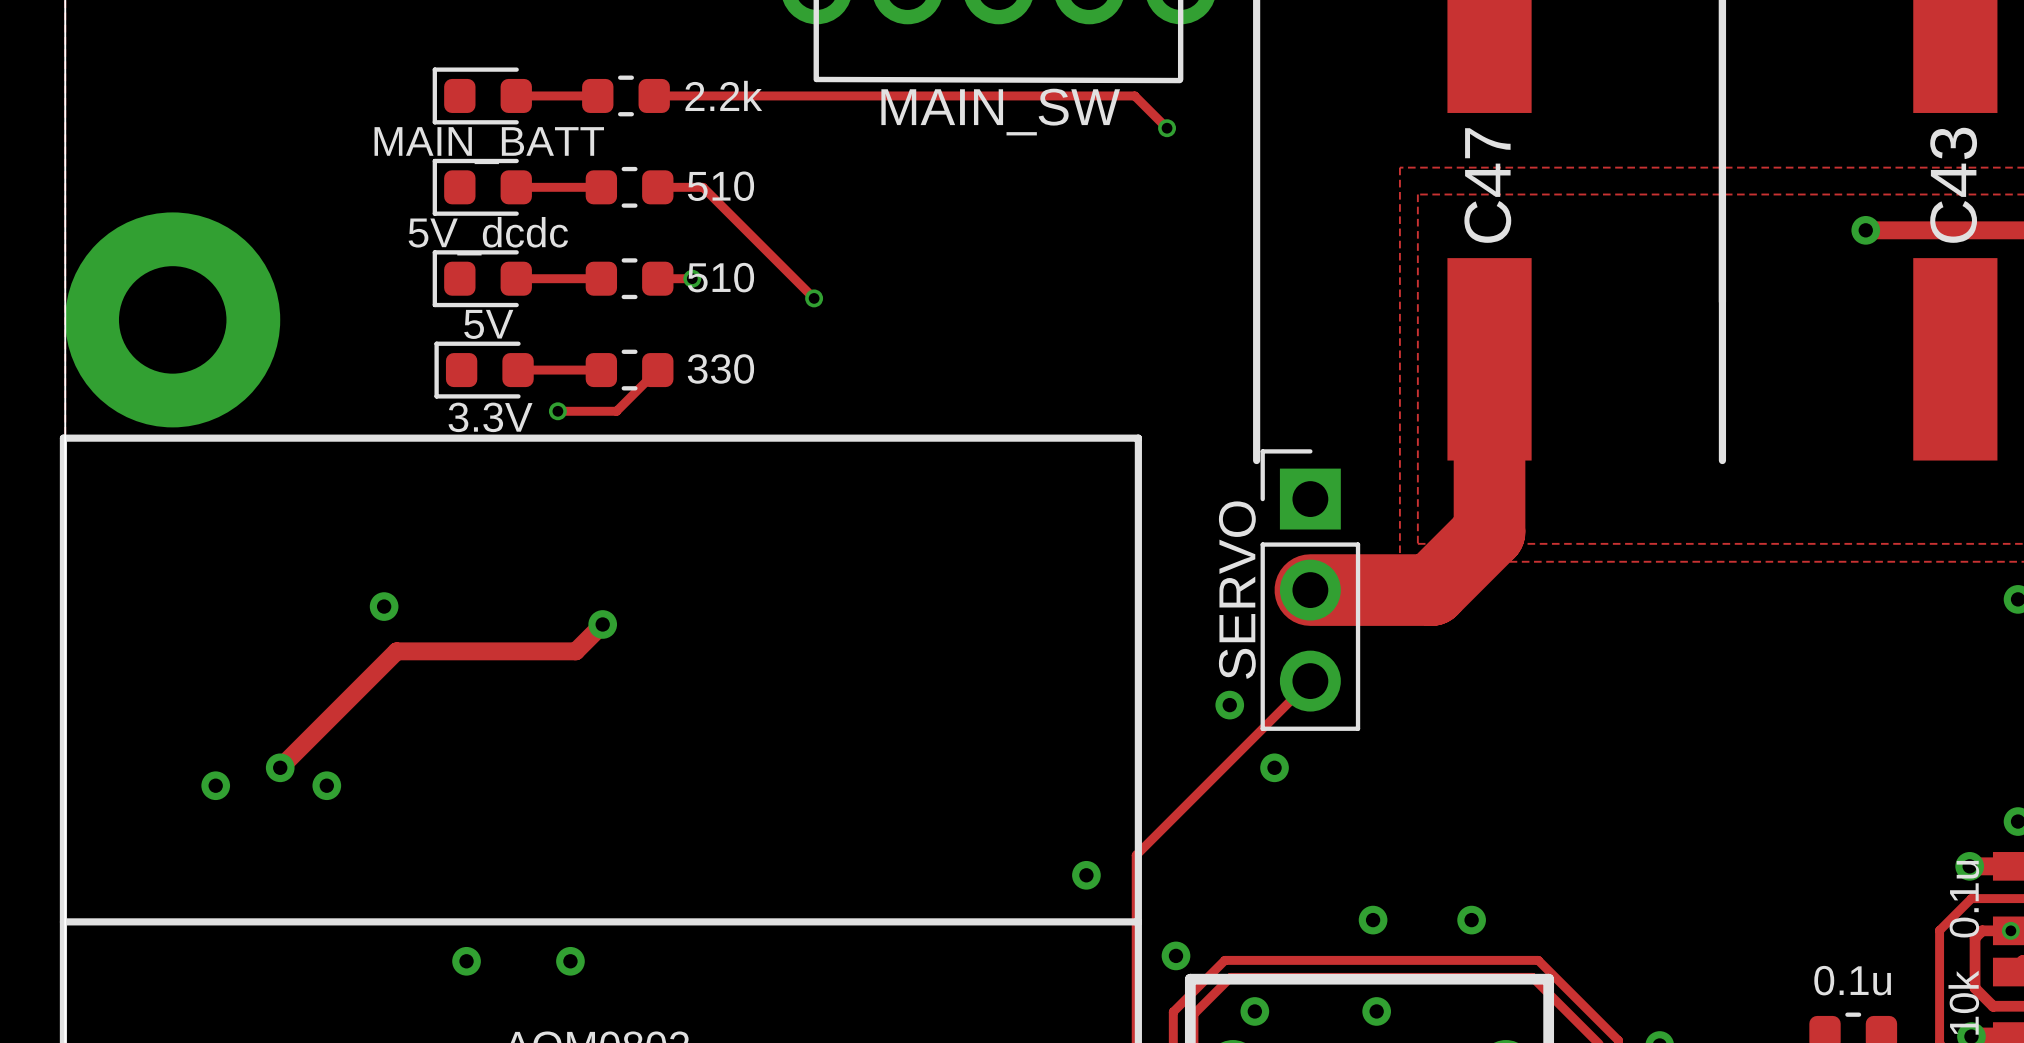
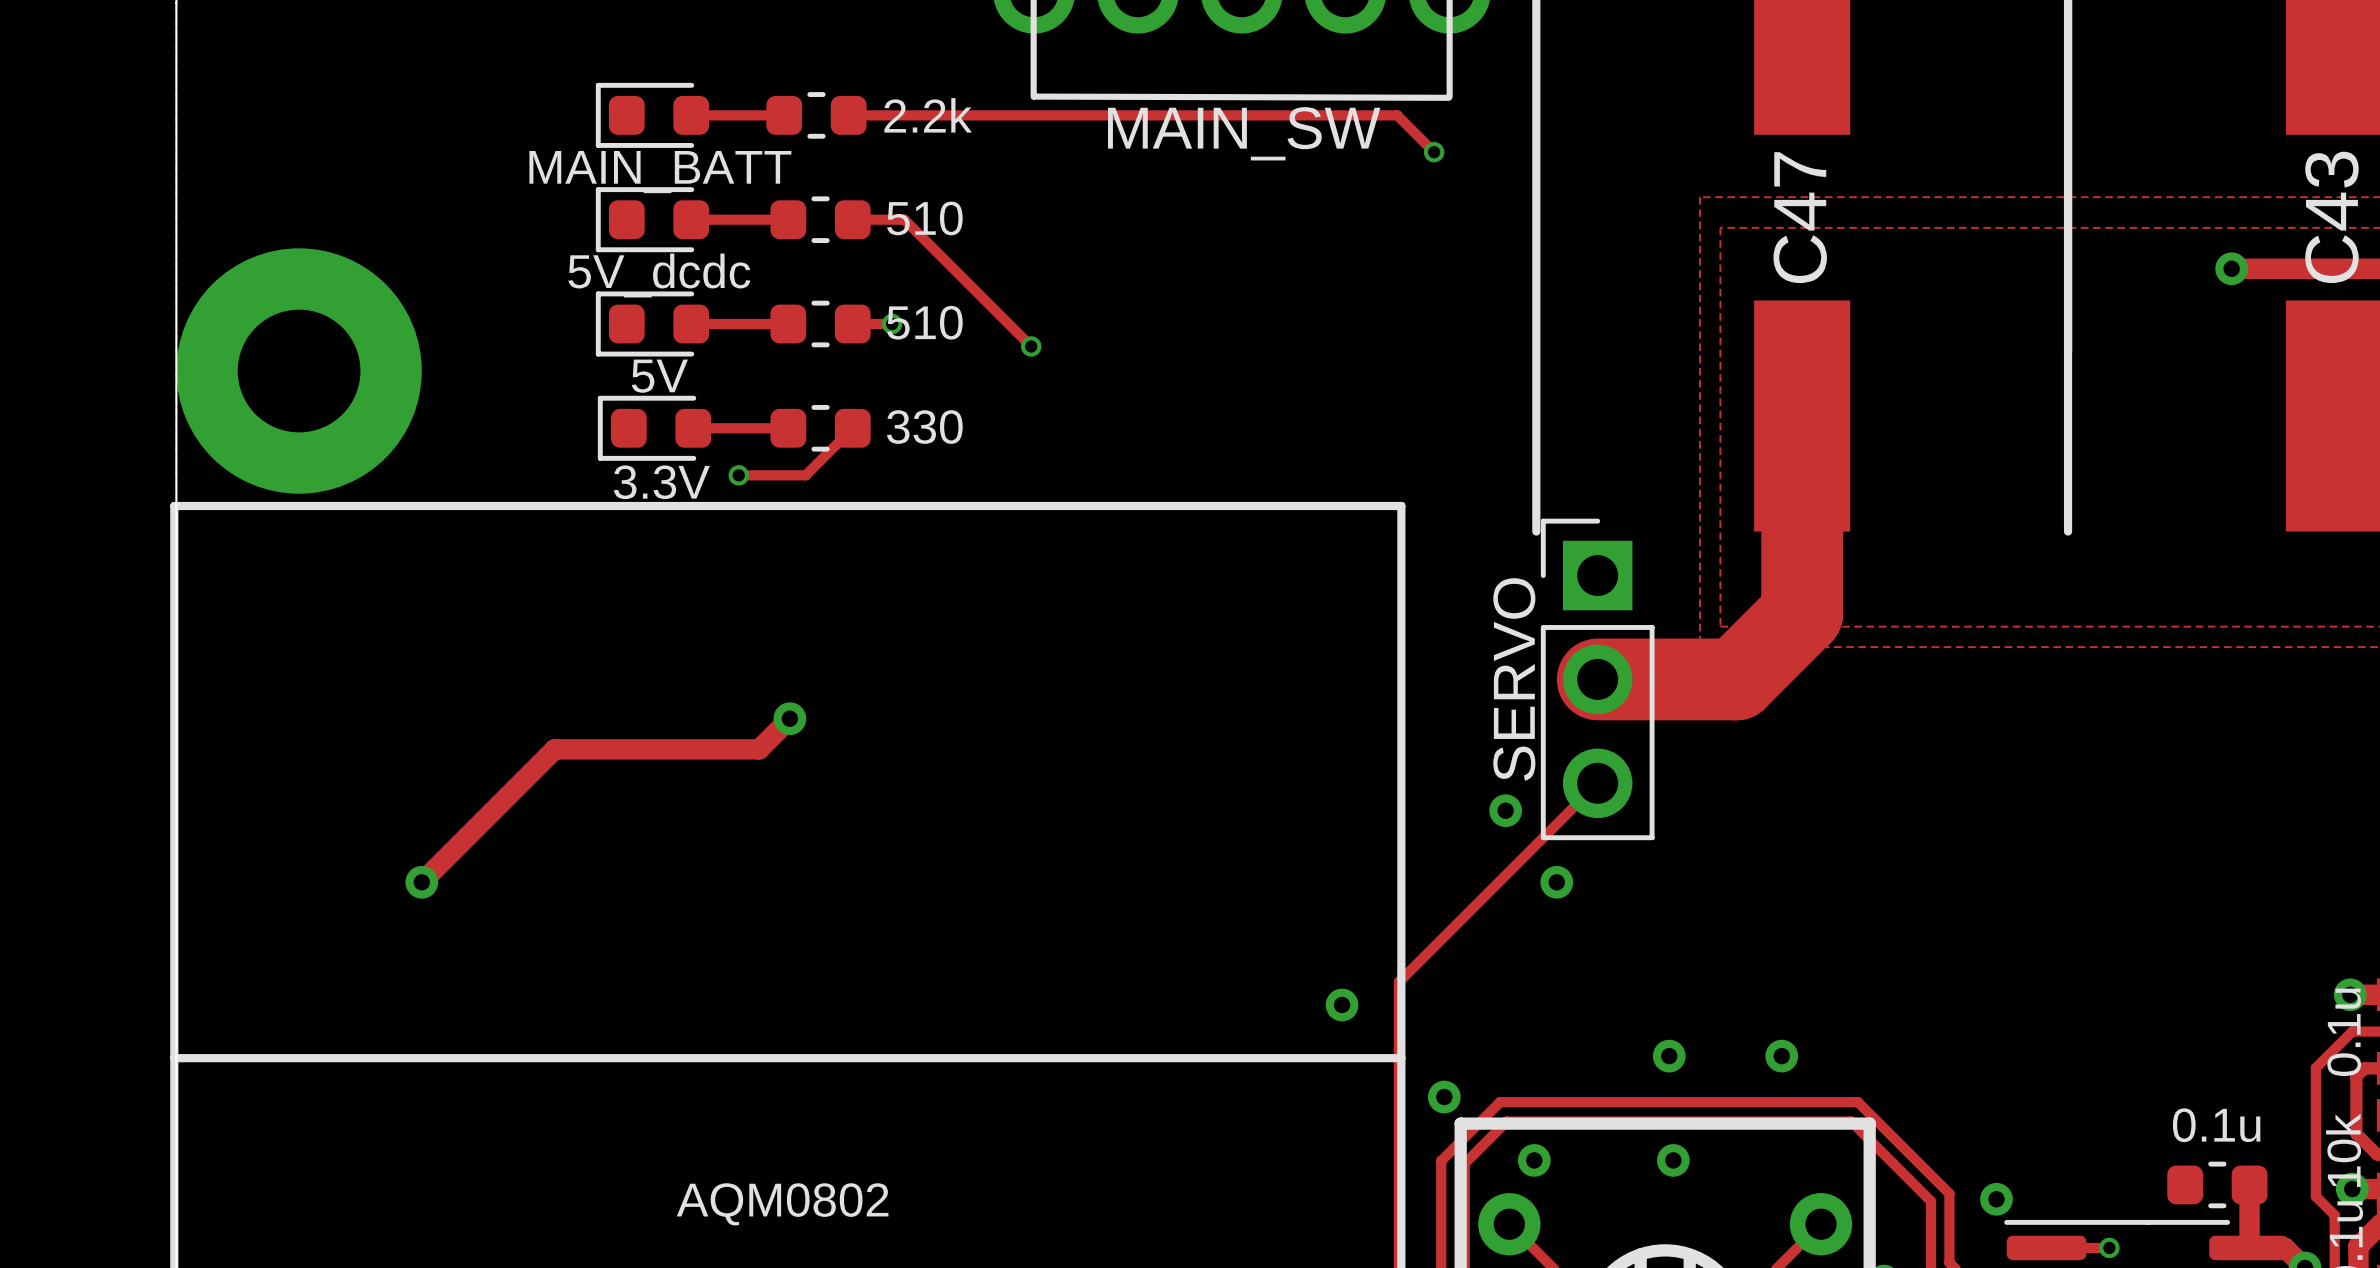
via: (384, 606) -> none
via: (215, 785) -> none
via: (326, 785) -> none
via: (466, 961) -> none
via: (570, 961) -> none

